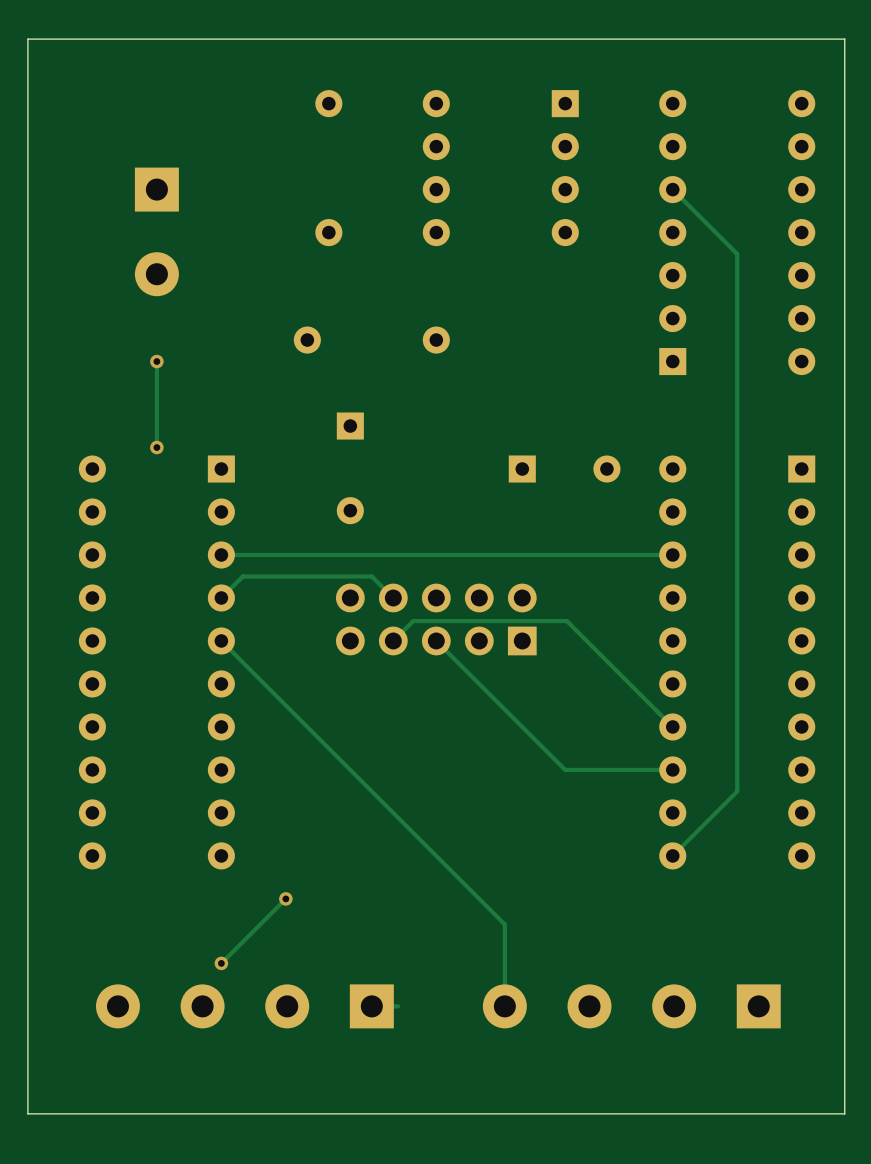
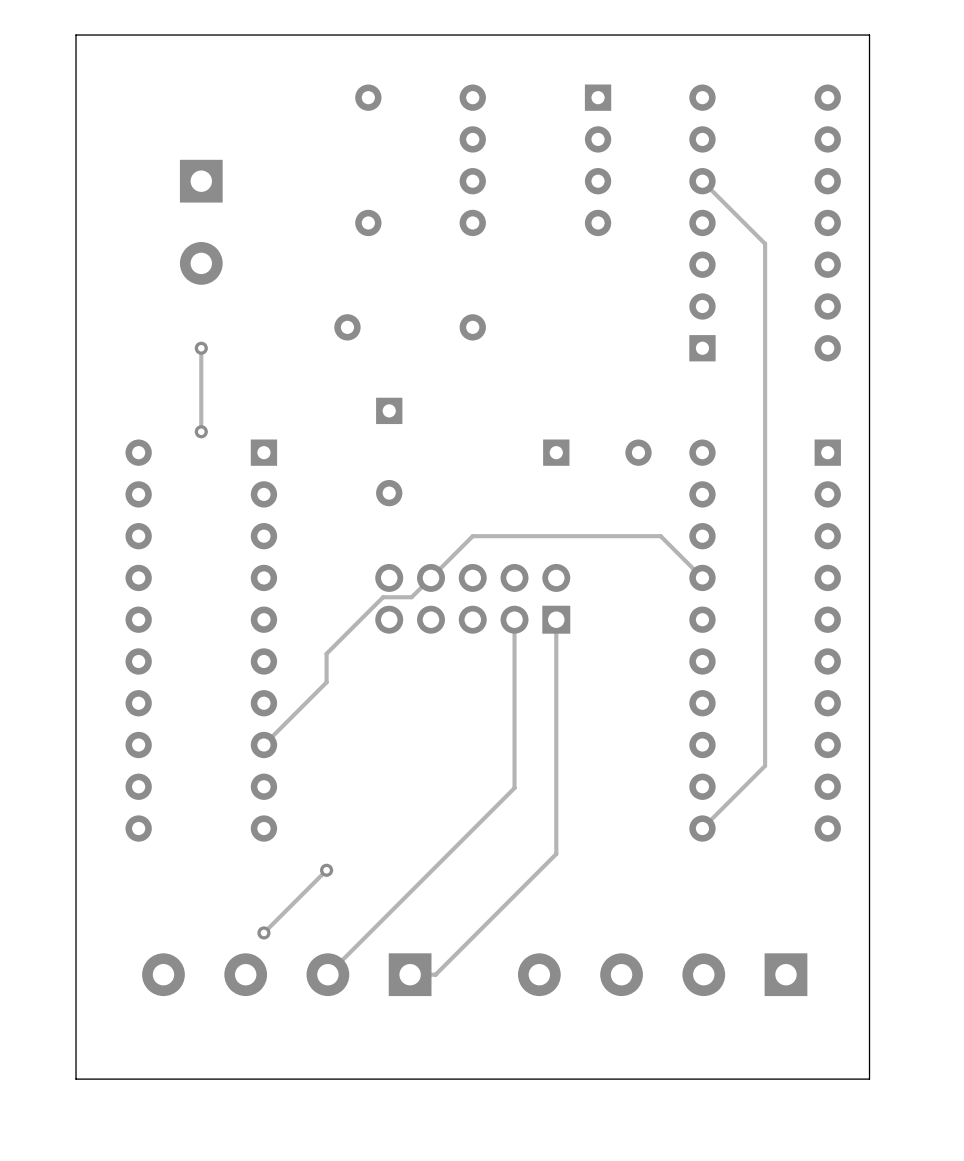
track: (436, 555) (221, 555) -> (472, 536) (411, 597) (383, 597) (326, 653) (326, 682) (263, 745)
track: (672, 555) (629, 555) -> (702, 577) (660, 536)
track: (393, 597) (371, 576) (242, 576) (221, 597) -> none
track: (221, 640) (504, 924) (504, 1006) -> none
track: (393, 640) (413, 621) (566, 621) (672, 726) -> none
track: (436, 640) (565, 769) (672, 769) -> none
track: none -> (514, 619) (514, 788) (327, 974)
track: none -> (556, 619) (556, 854) (435, 974)

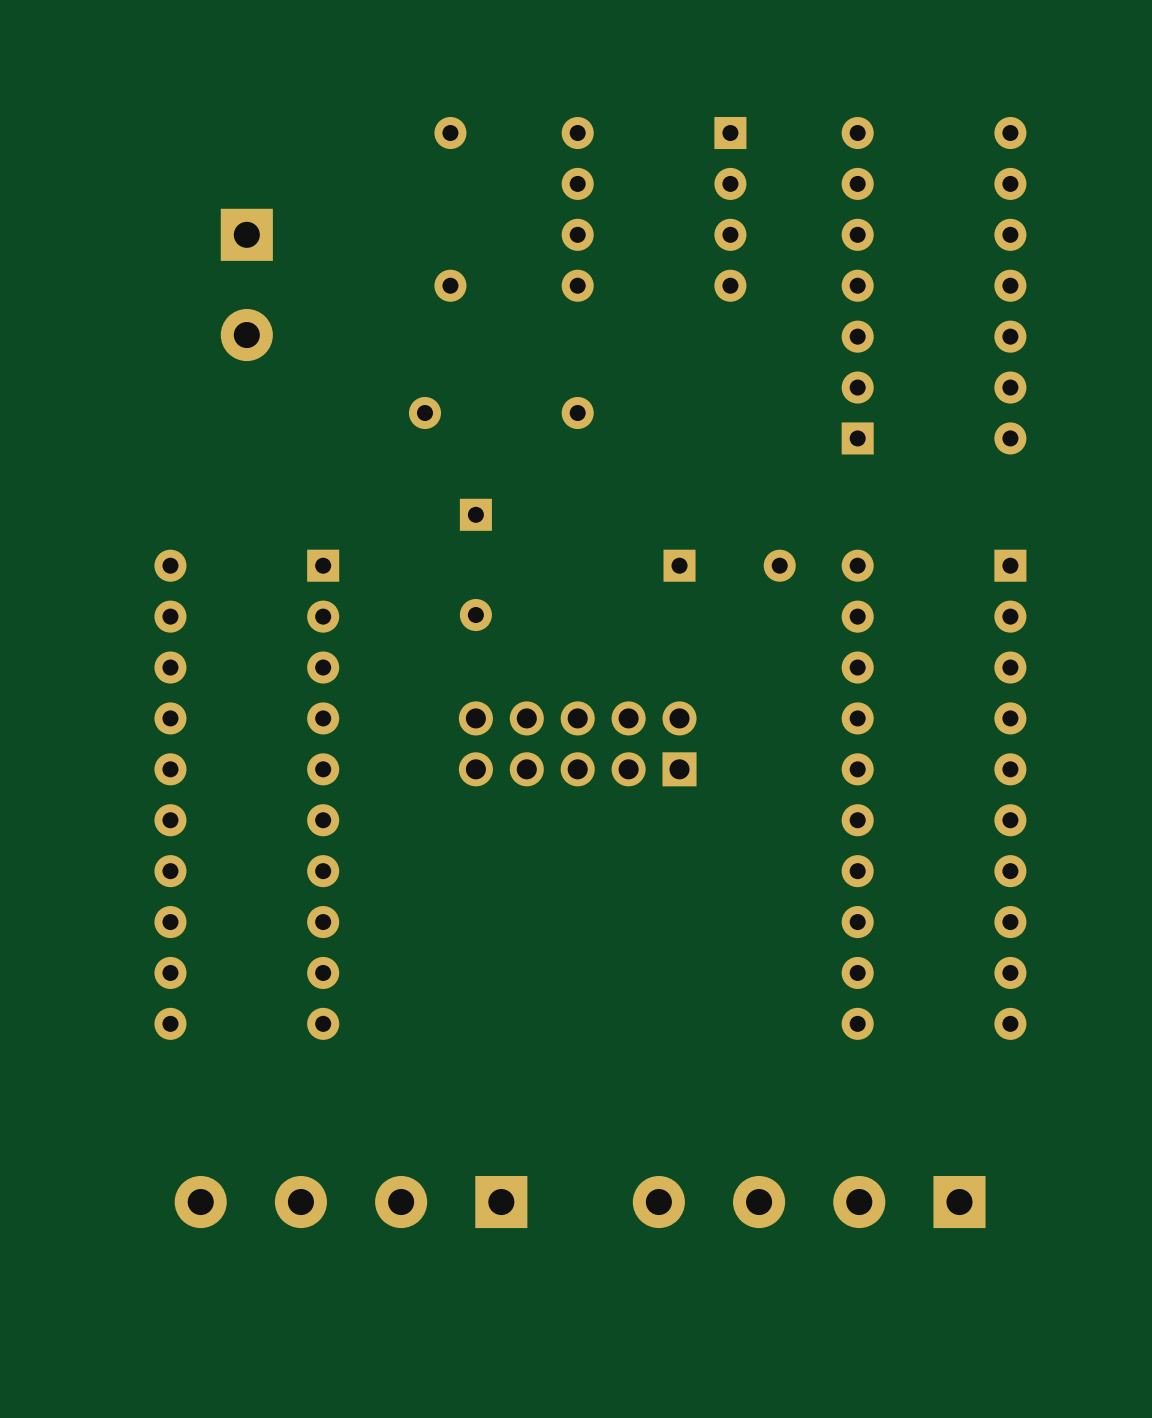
board edge: (869, 35) (869, 1079) (76, 1079) (76, 35) (869, 35) -> none
track: (702, 181) (765, 243) (765, 765) (702, 828) -> none
track: (201, 348) (201, 431) -> none
via: (201, 348) -> none
via: (201, 431) -> none
track: (702, 577) (660, 536) (472, 536) (411, 597) (383, 597) (326, 653) (326, 682) (263, 745) -> none
track: (514, 619) (514, 788) (327, 974) -> none
track: (556, 619) (556, 854) (435, 974) (410, 974) -> none
track: (326, 870) (263, 932) -> none
via: (326, 870) -> none
via: (263, 932) -> none

